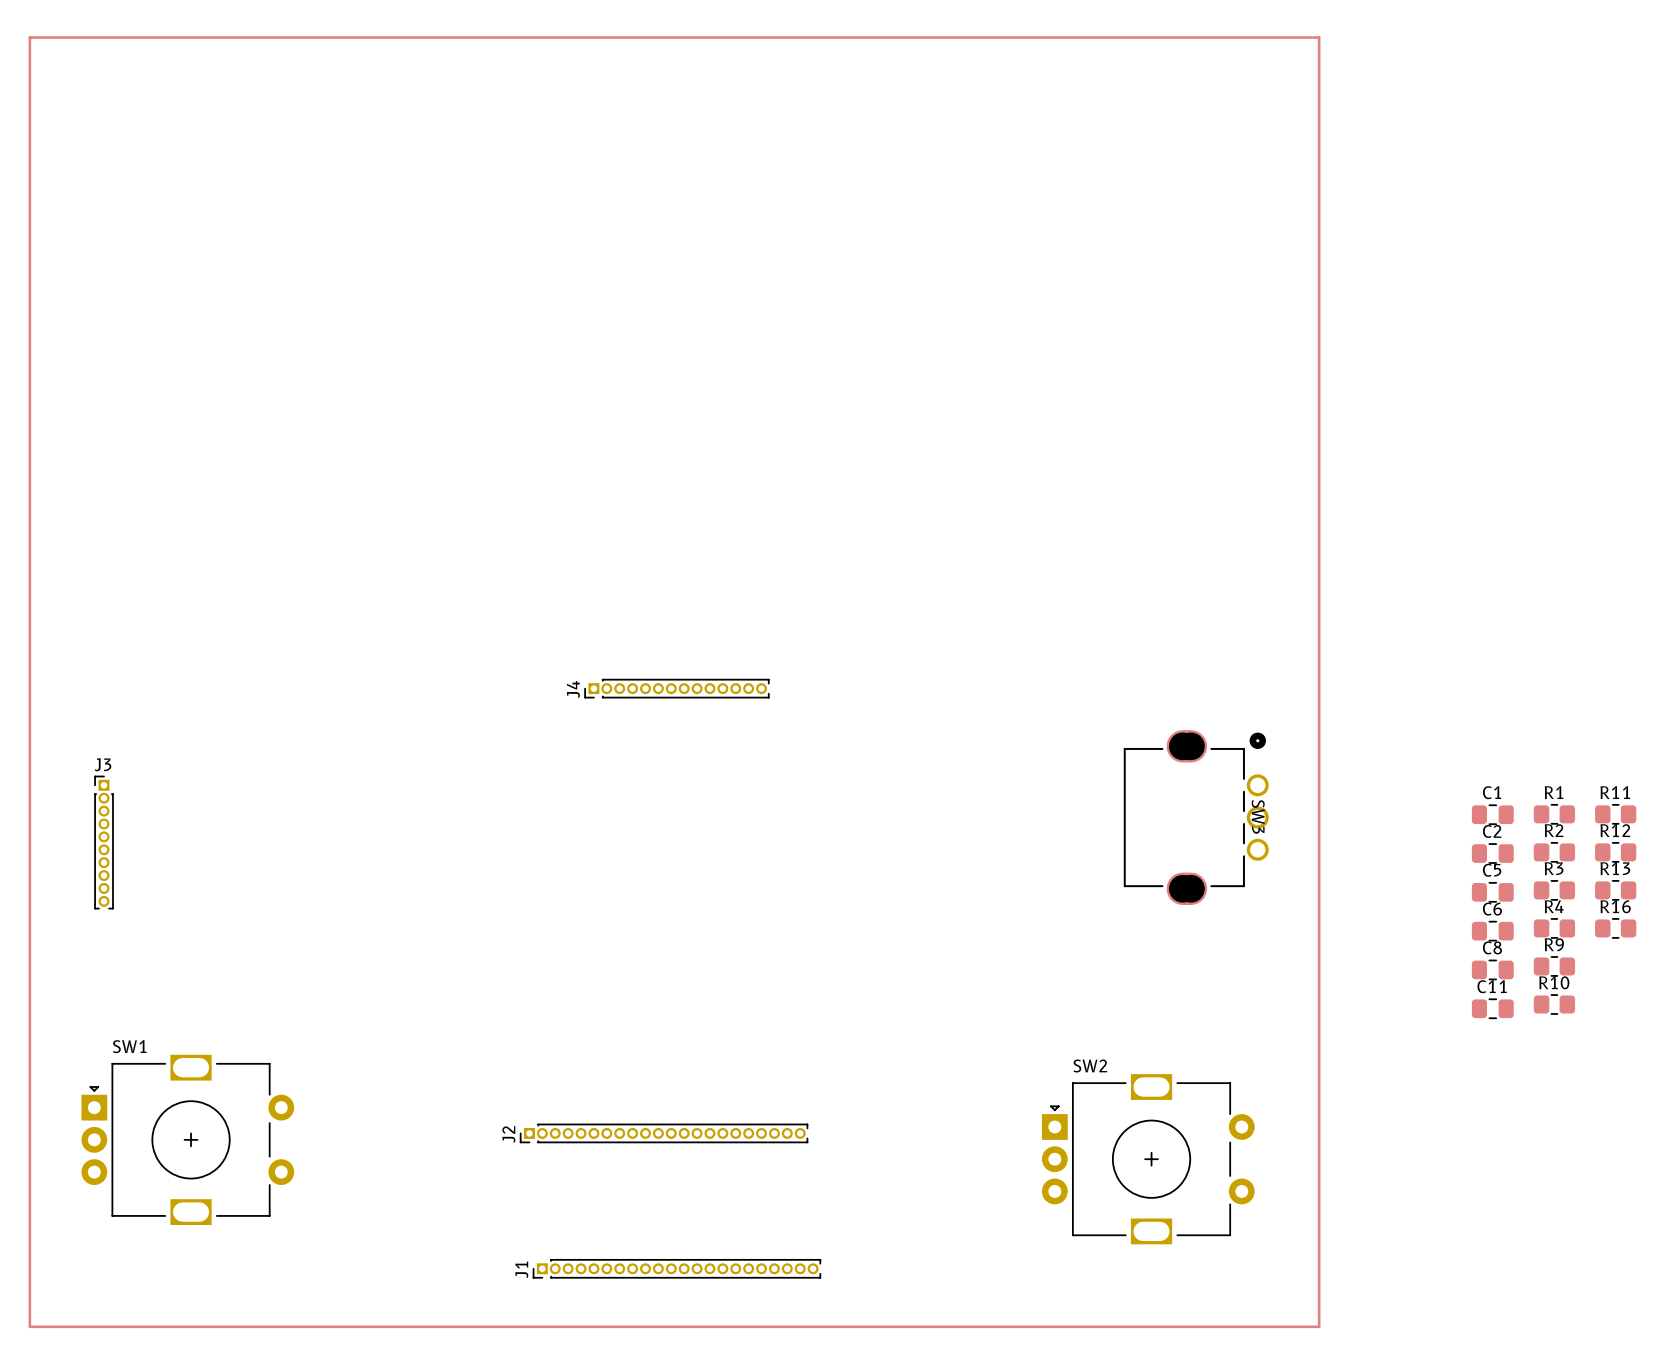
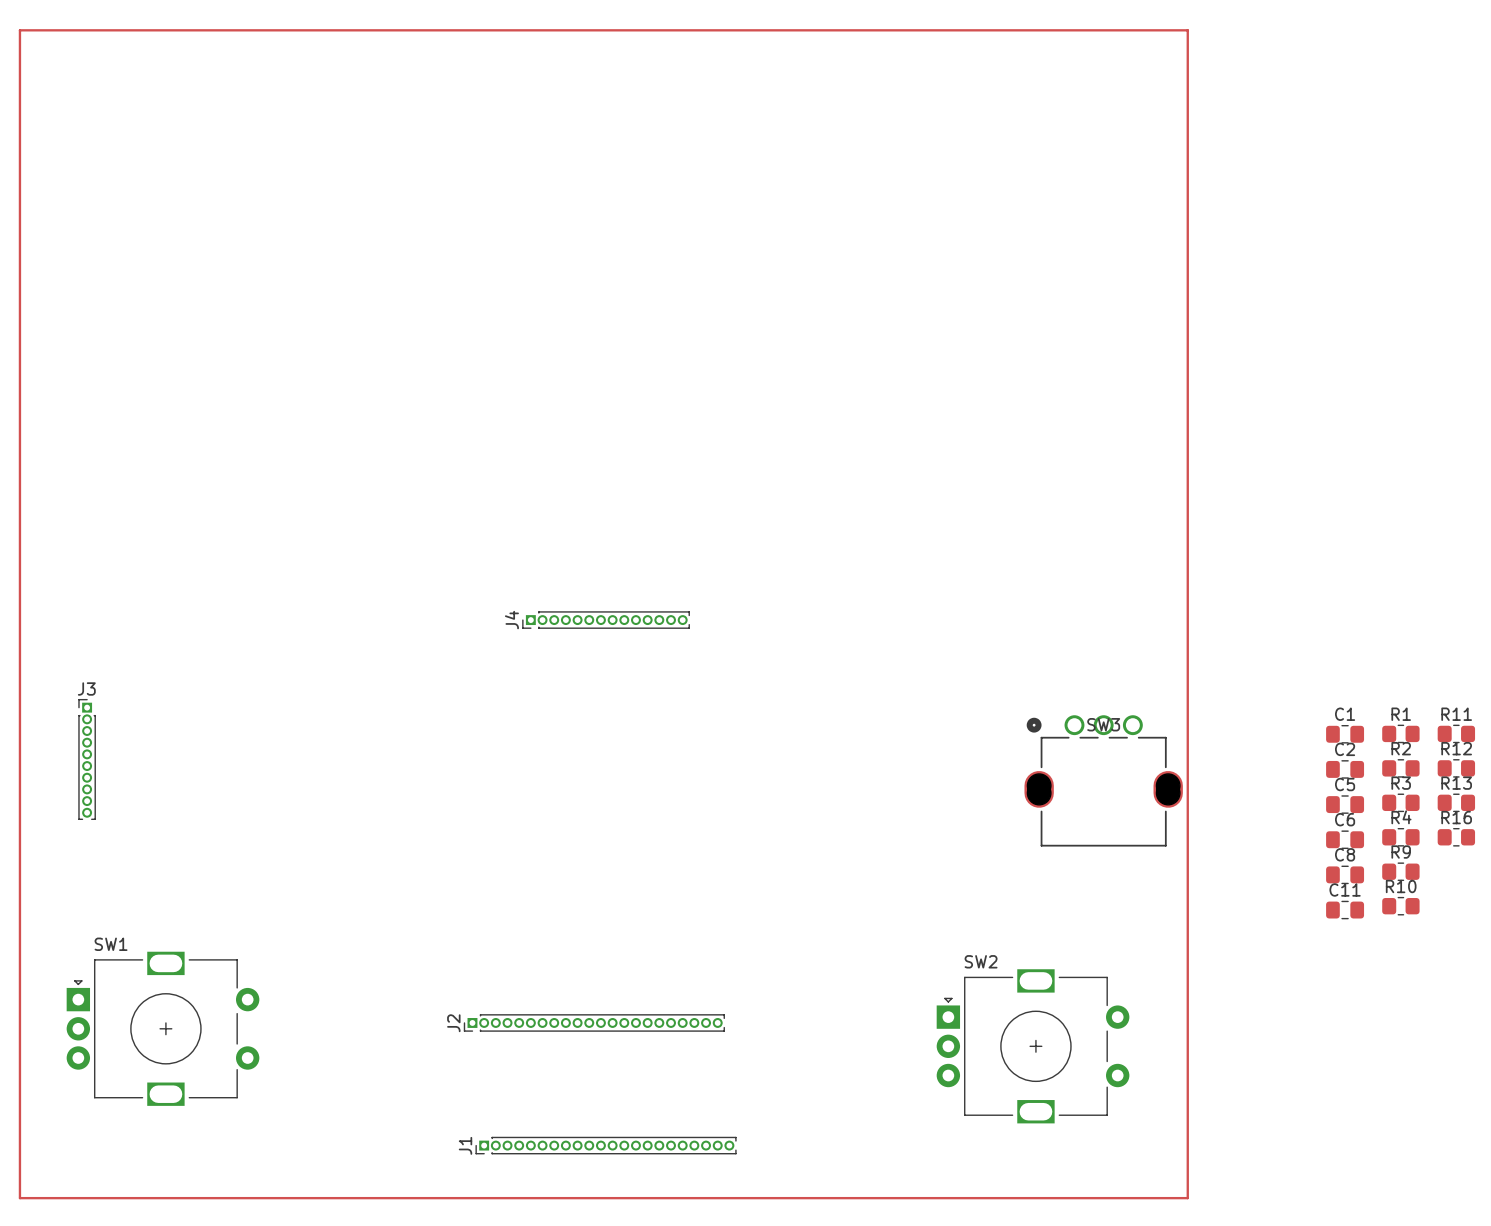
SW3 rotation: 0° (1196, 817) -> 90° counterclockwise (1103, 780)

